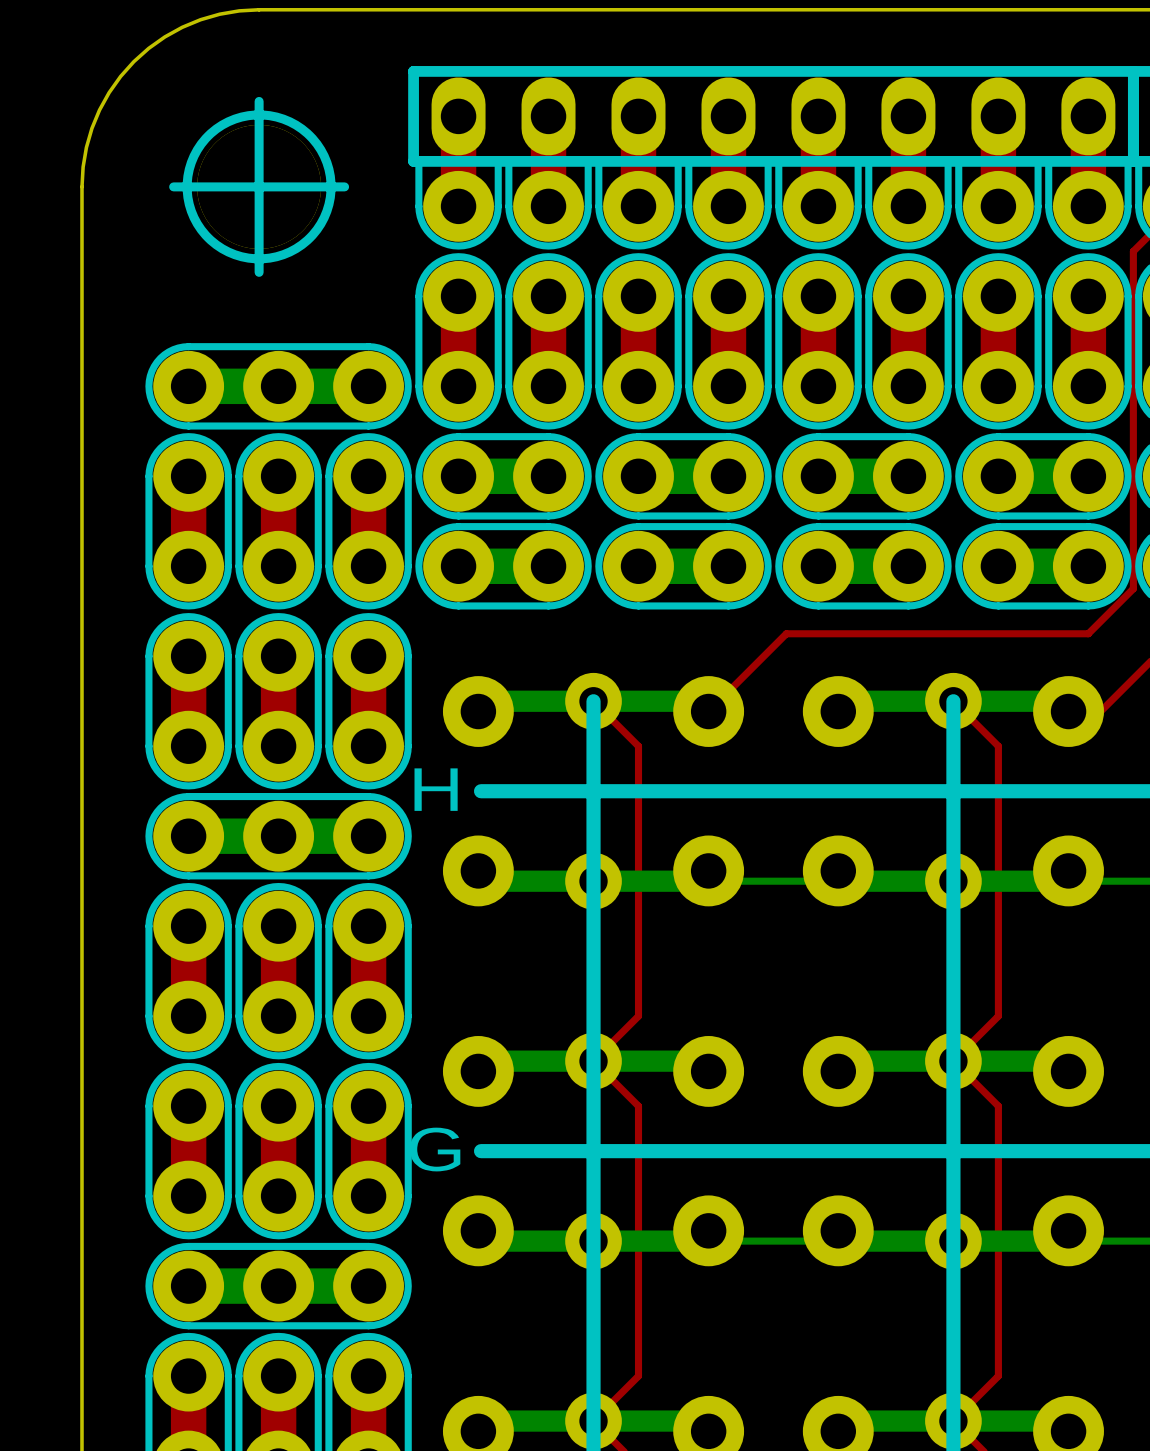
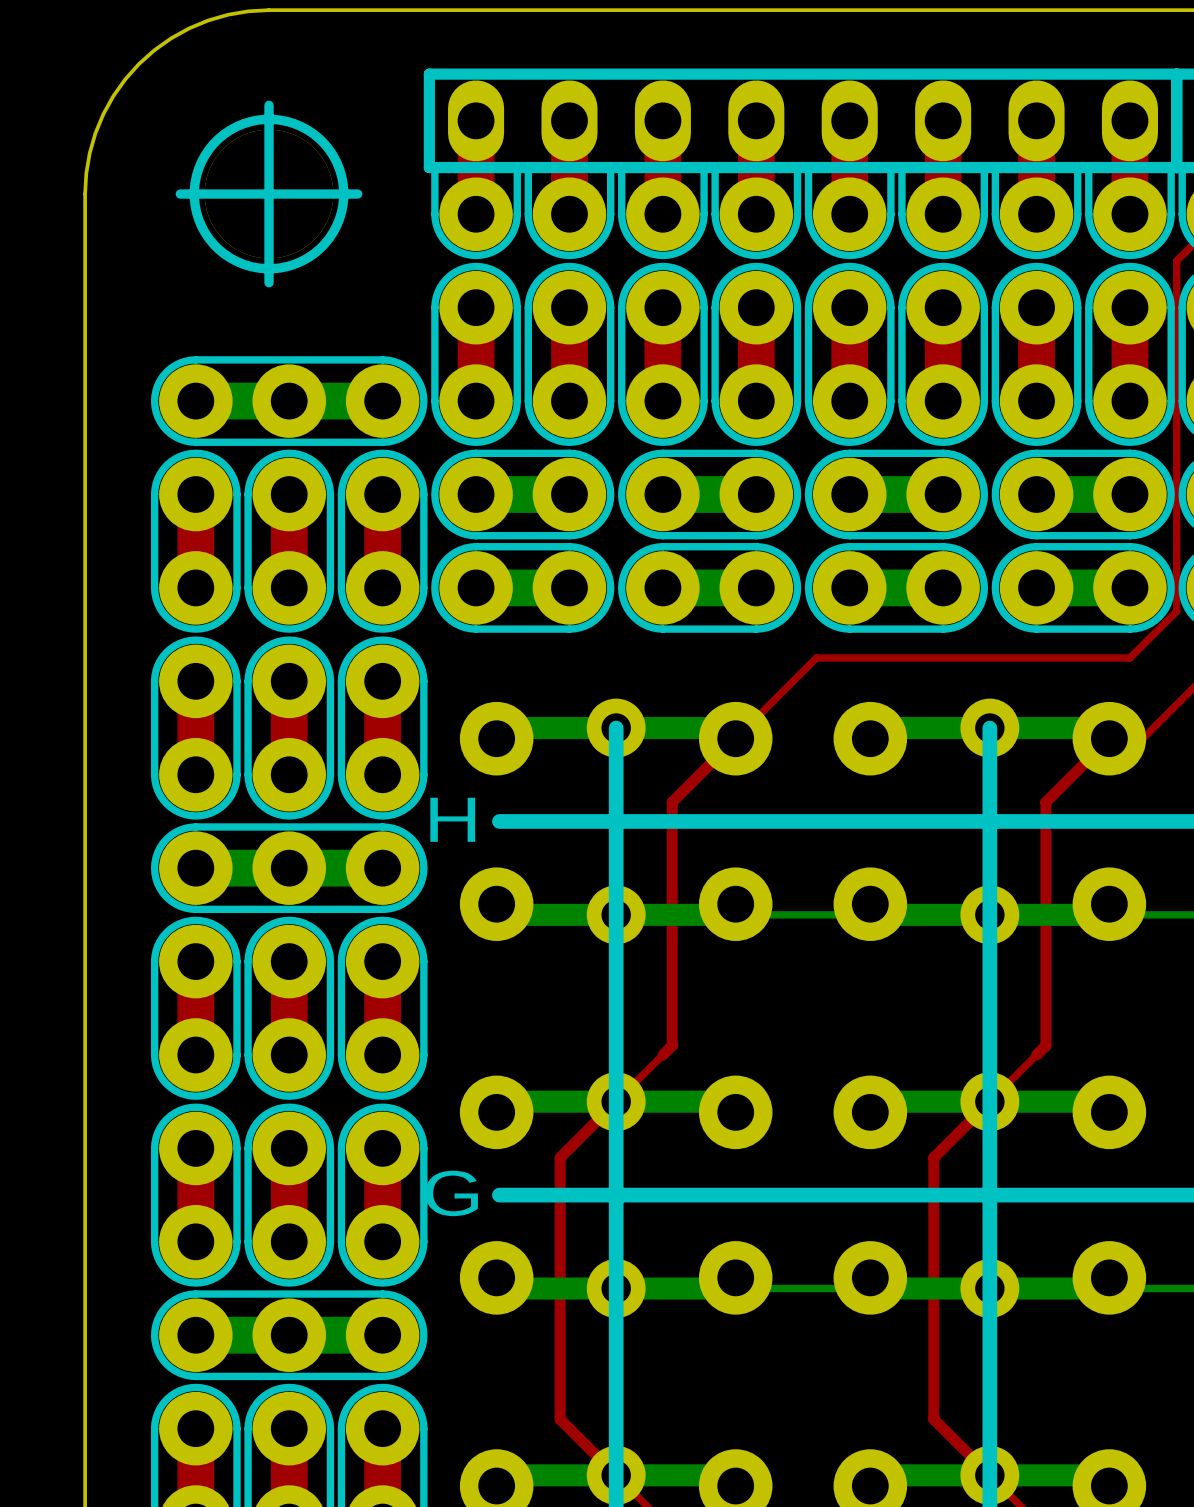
top track: (593, 701) (638, 746) (638, 1016) -> (735, 738) (672, 802) (672, 1045) (662, 1054)
top track: (953, 701) (998, 746) (998, 1016) -> (1109, 738) (1045, 802) (1045, 1045) (1036, 1054)
top track: (593, 1061) (638, 1106) (638, 1376) (593, 1421) -> (616, 1101) (560, 1157) (560, 1419) (616, 1475)
top track: (953, 1061) (998, 1106) (998, 1376) (953, 1421) -> (989, 1101) (933, 1157) (933, 1419) (989, 1475)

